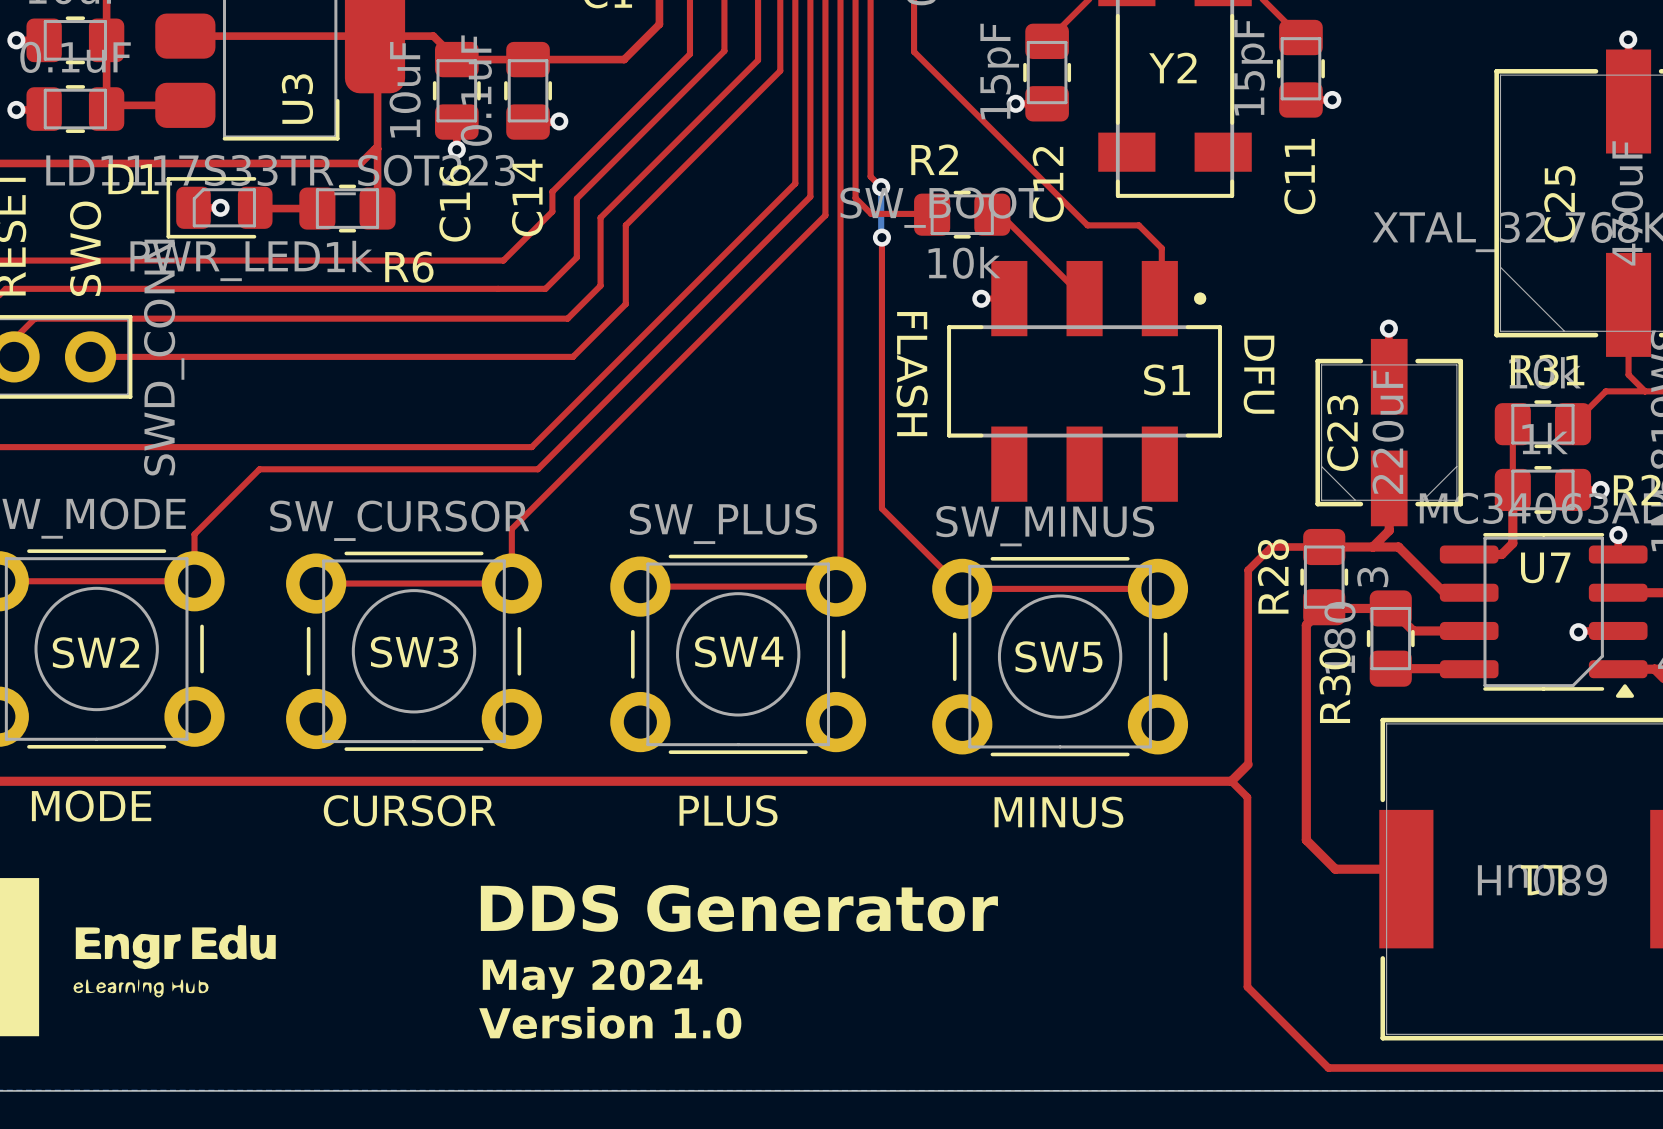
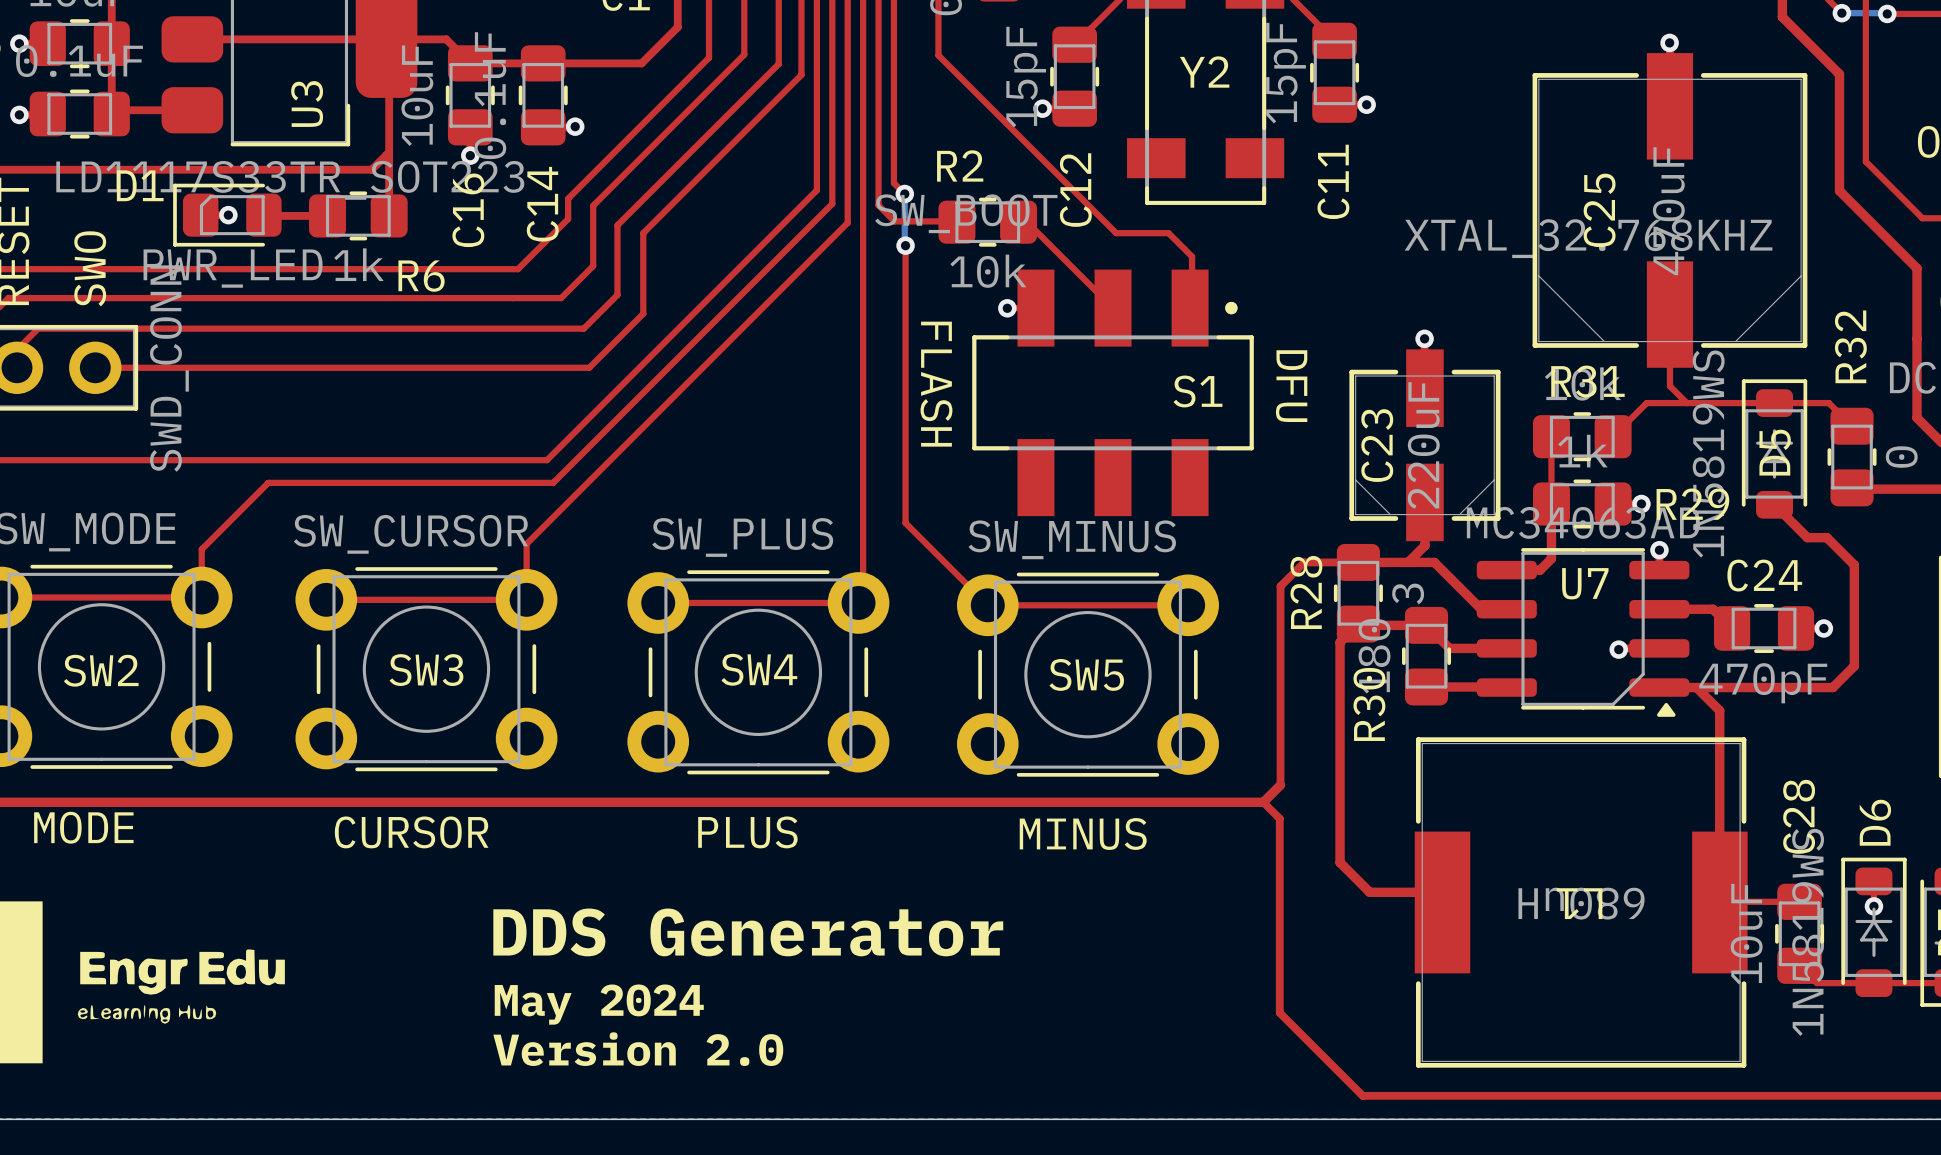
text: Version 1.0 (610, 1022) -> Version 2.0 (638, 1049)

